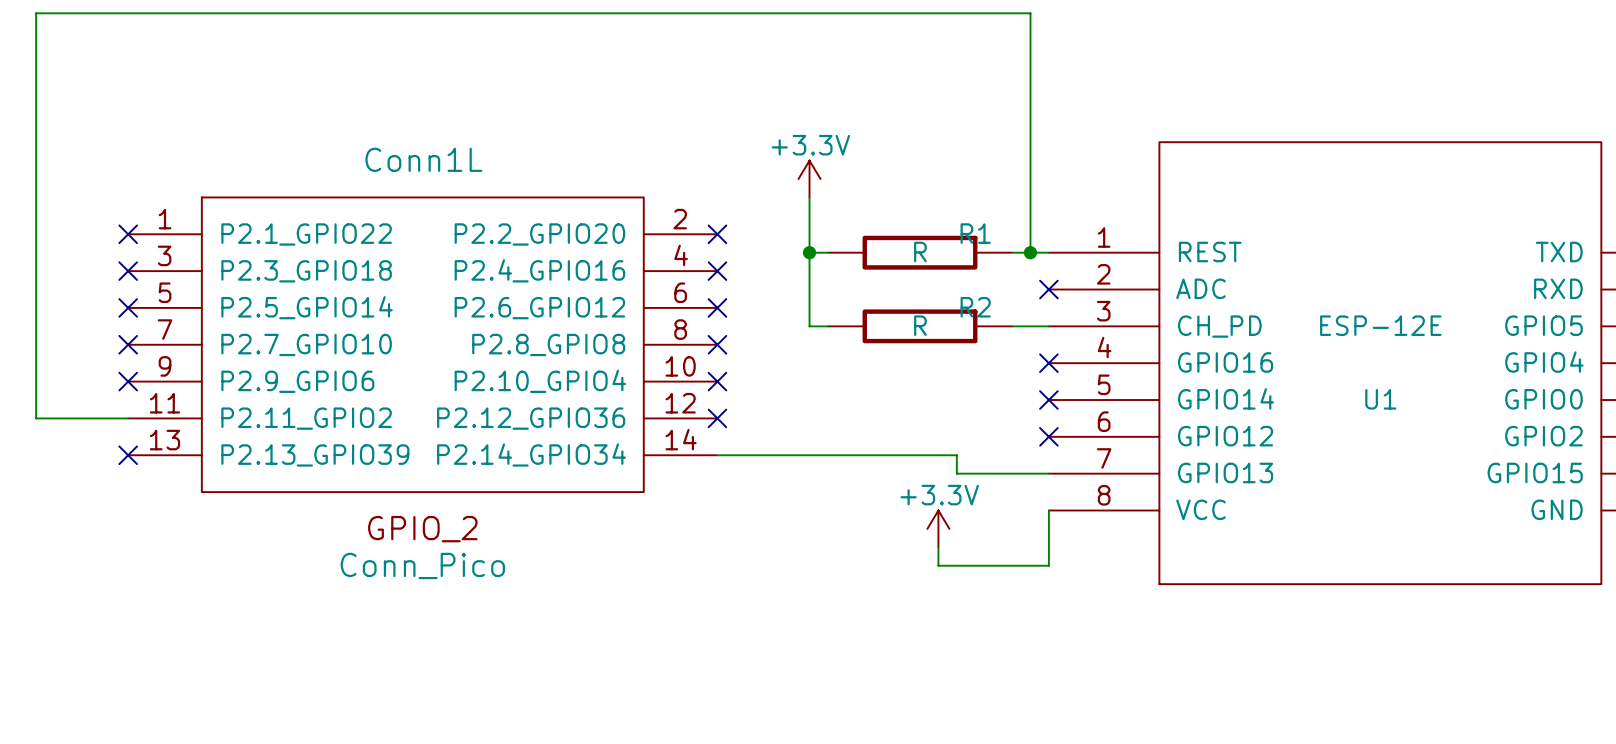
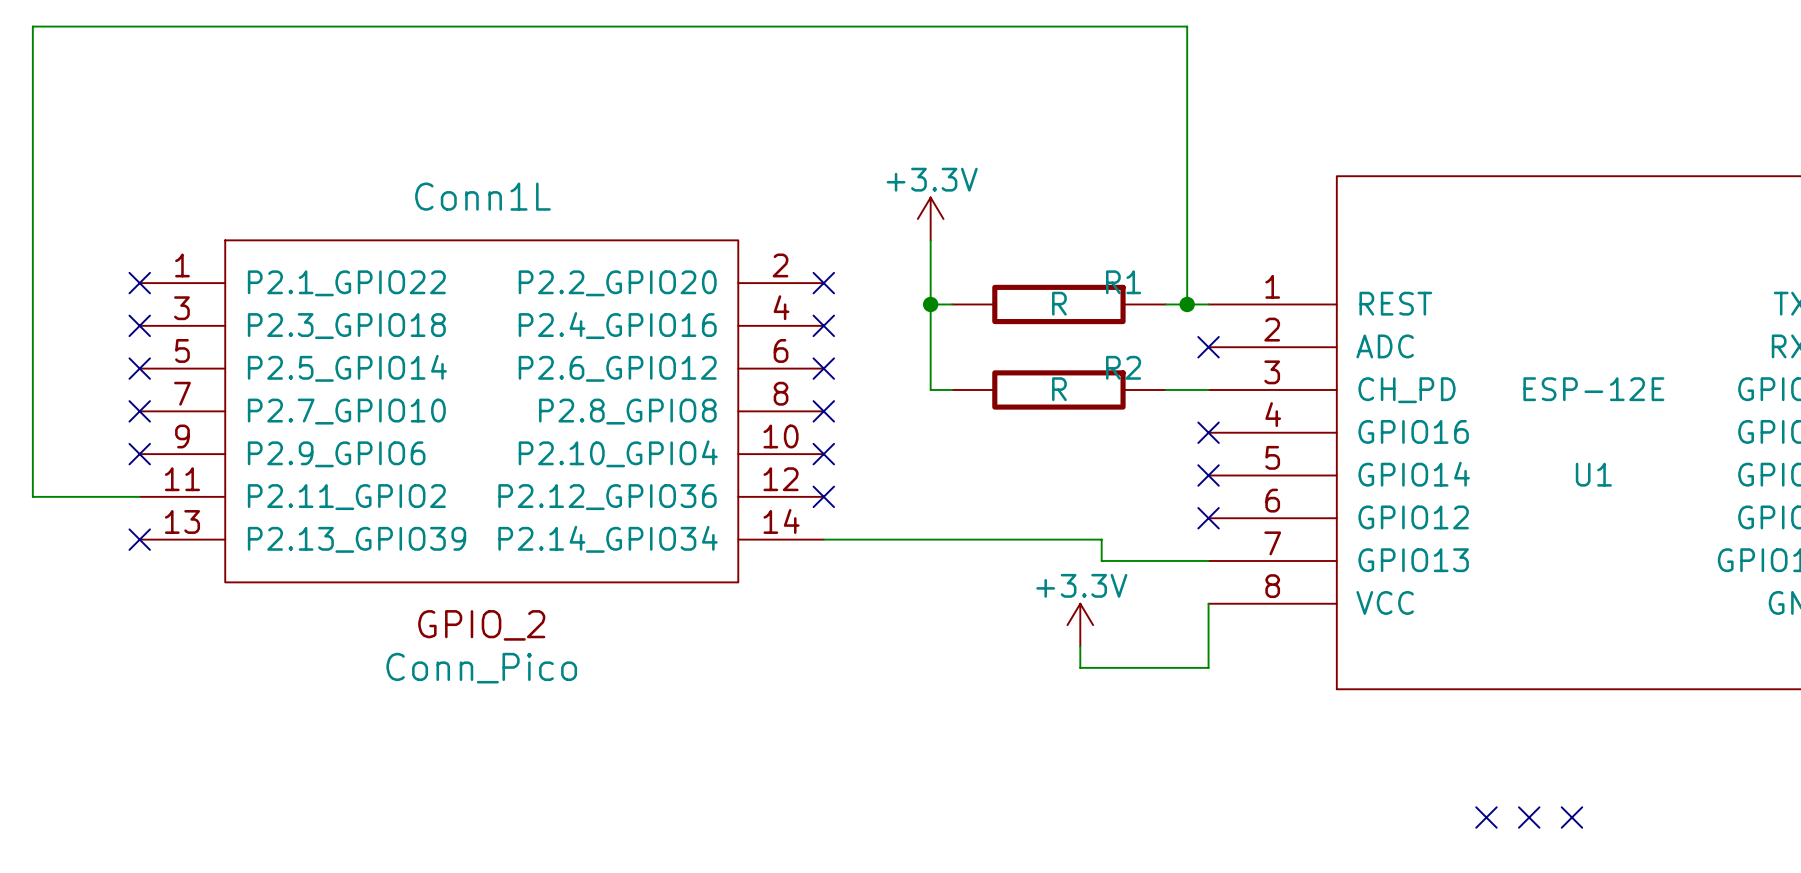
no-connect mark: none -> (1486, 817)
no-connect mark: none -> (1529, 817)
no-connect mark: none -> (1571, 817)

